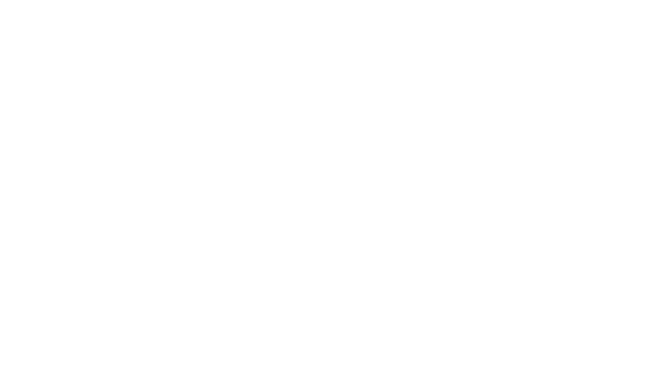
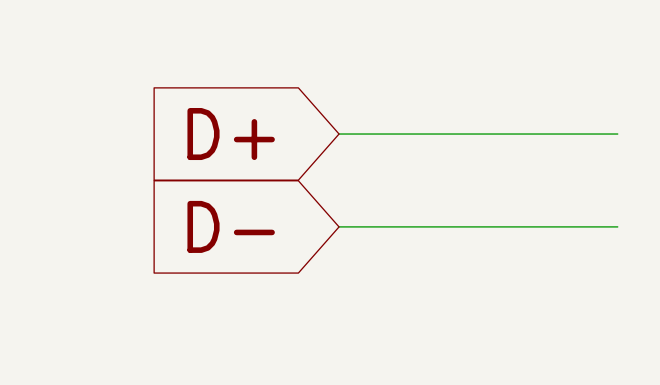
global label: none -> D+ (231, 134)
wire: none -> (339, 134) (617, 134)
global label: none -> D- (231, 226)
wire: none -> (339, 226) (617, 226)

